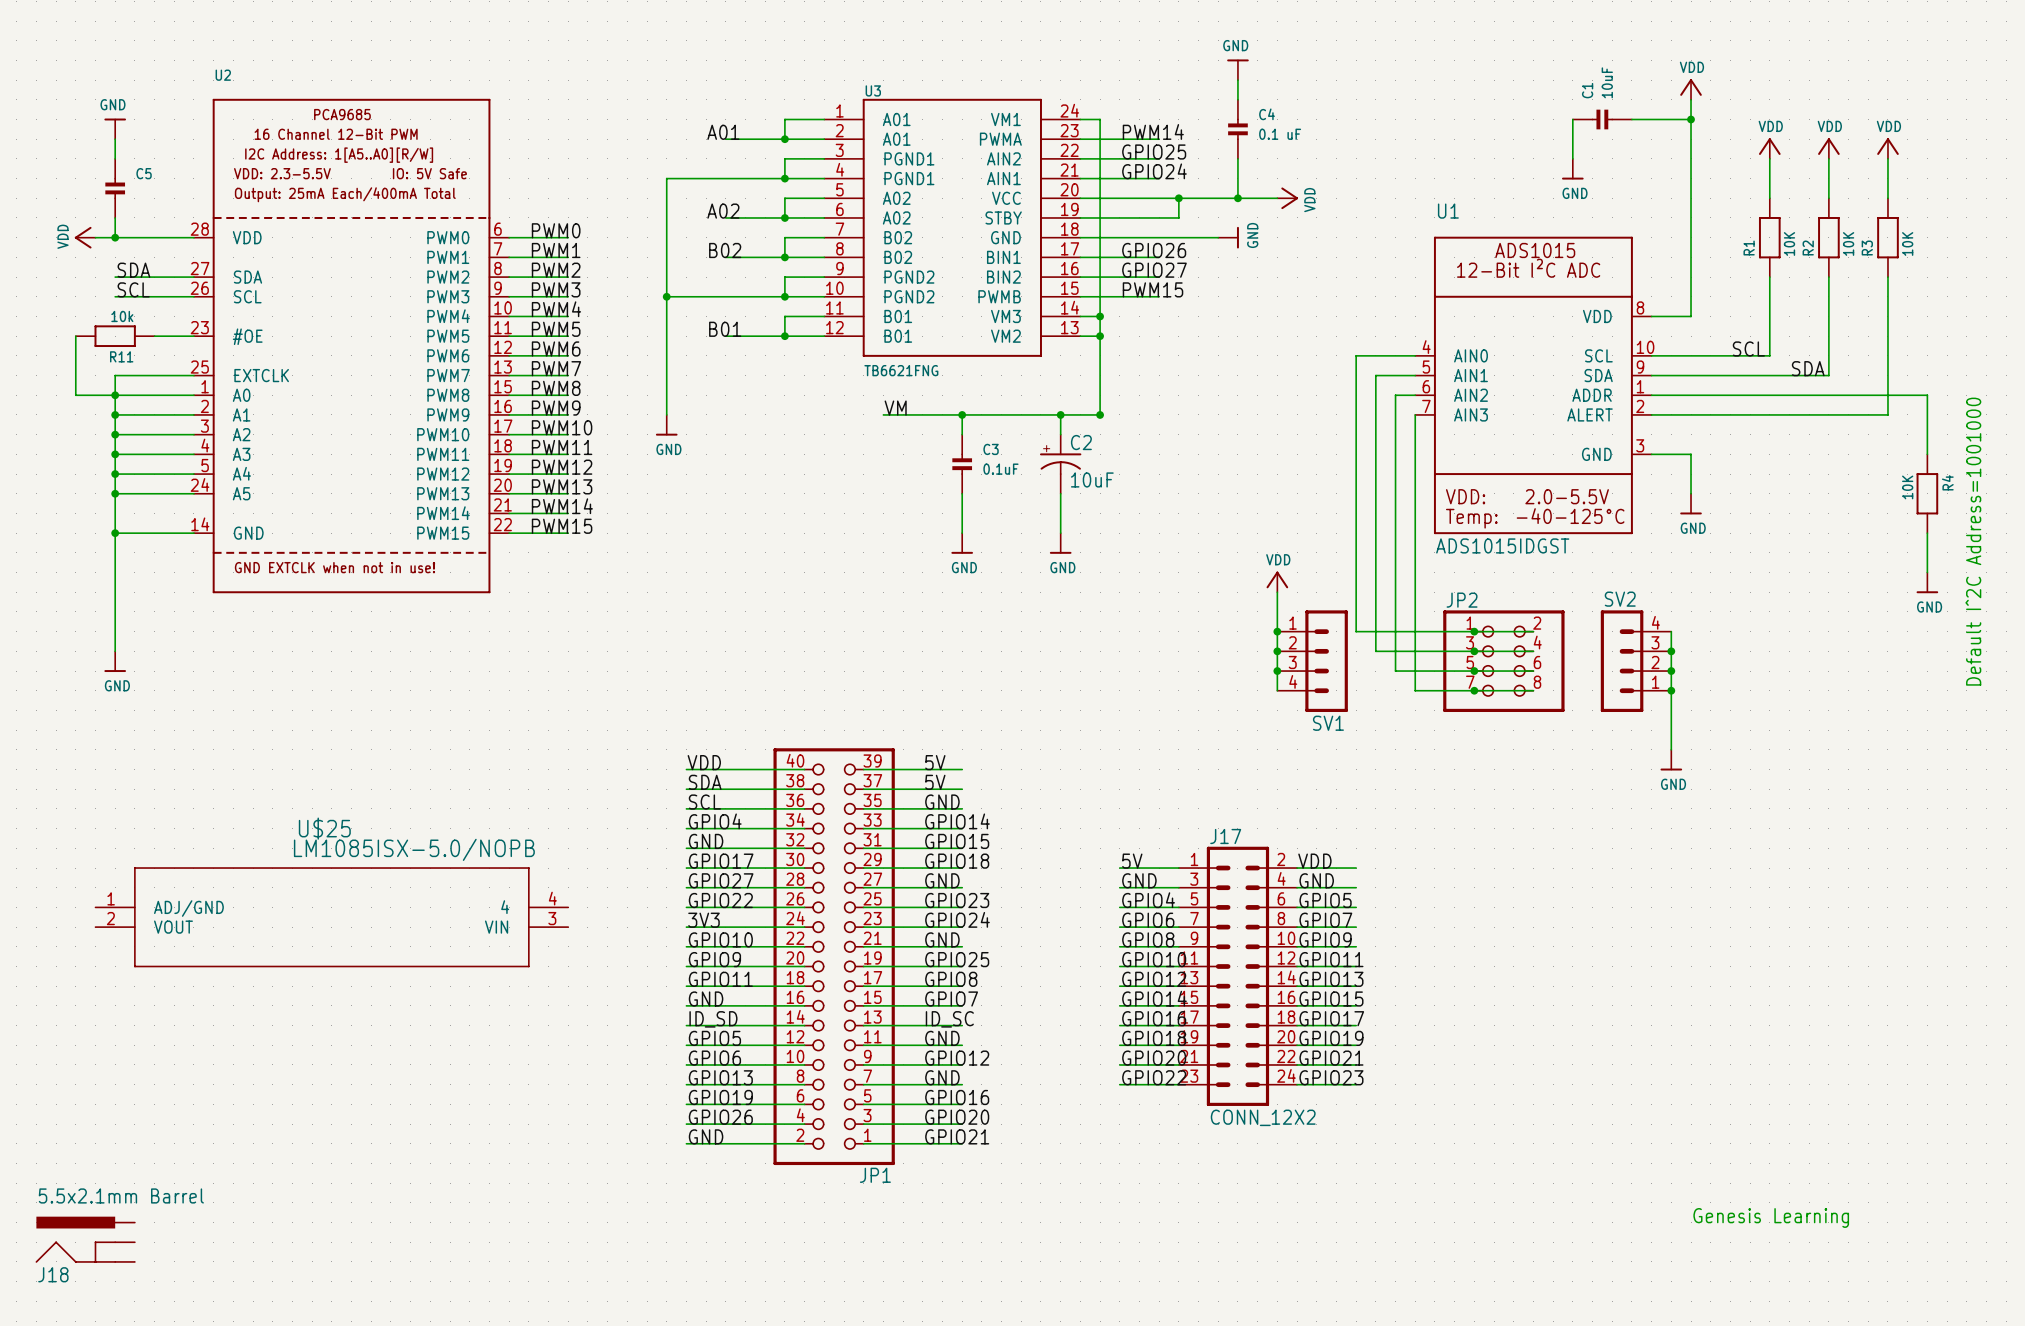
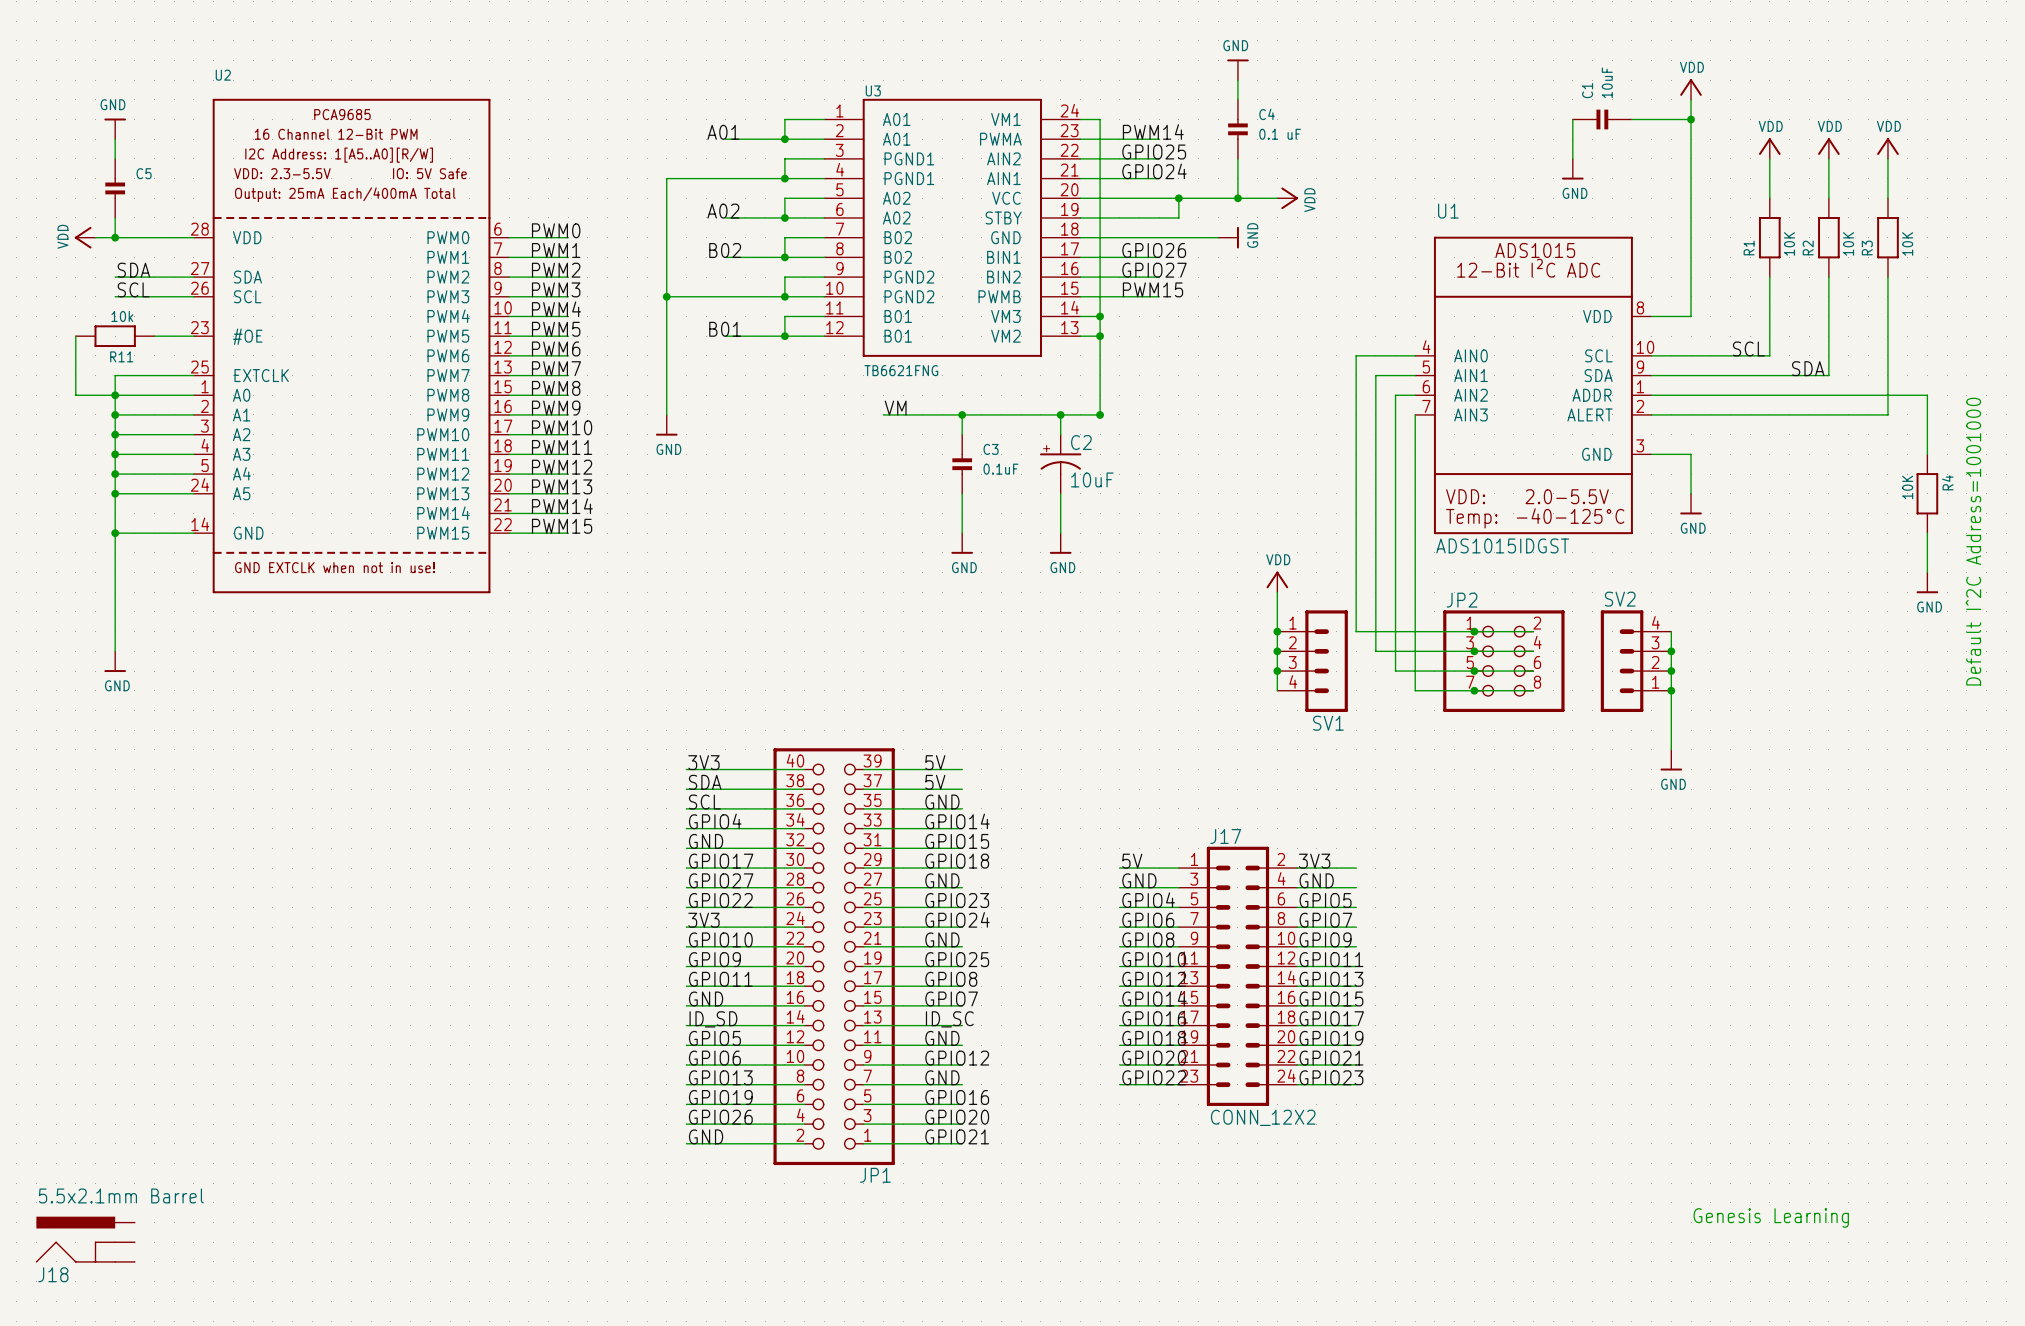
label: VDD (704, 762) -> 3V3 (703, 762)
label: VDD (1314, 861) -> 3V3 (1314, 861)
U$25: LM1085ISX-5.0/NOPB (331, 917) -> none

